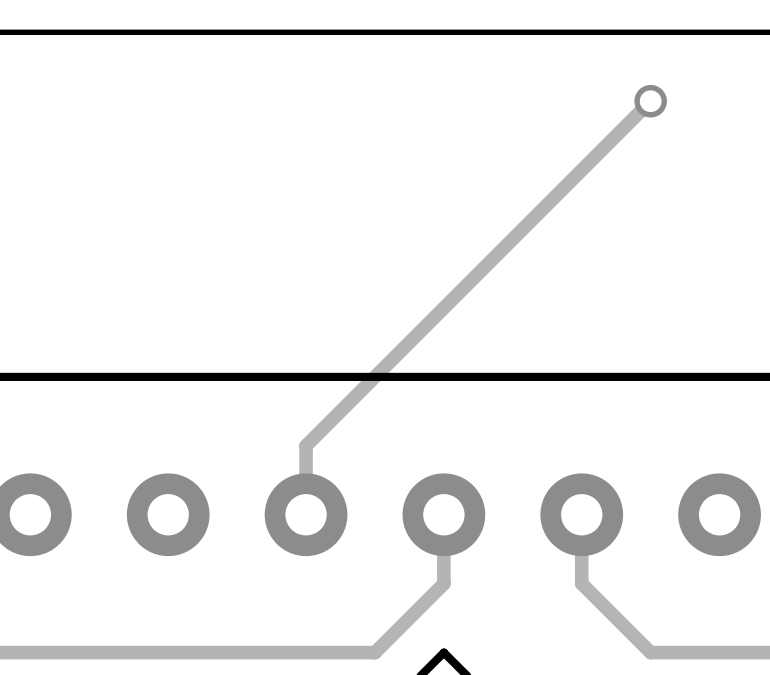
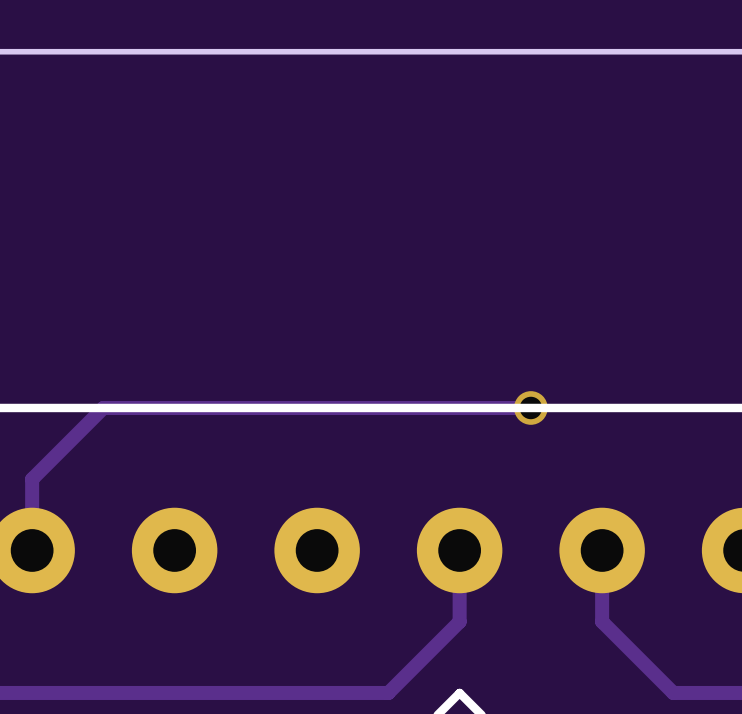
track: (650, 101) (306, 445) (306, 514) -> none
via position: (650, 101) -> (530, 407)
track: none -> (530, 407) (103, 407) (32, 479) (32, 550)

